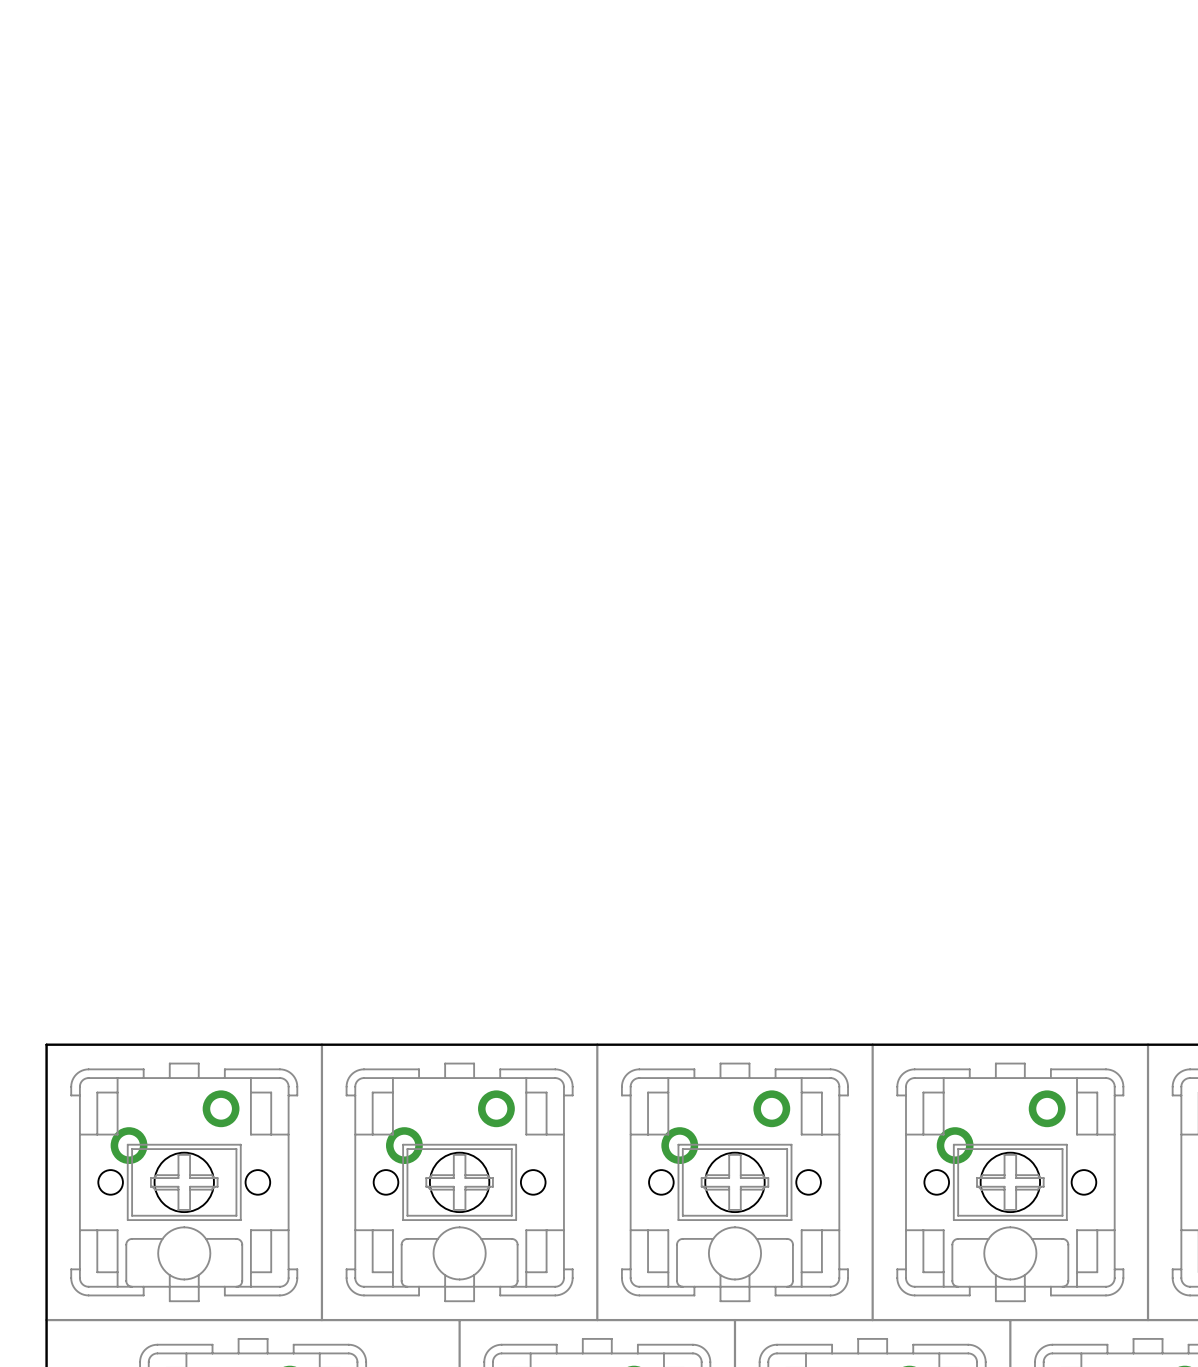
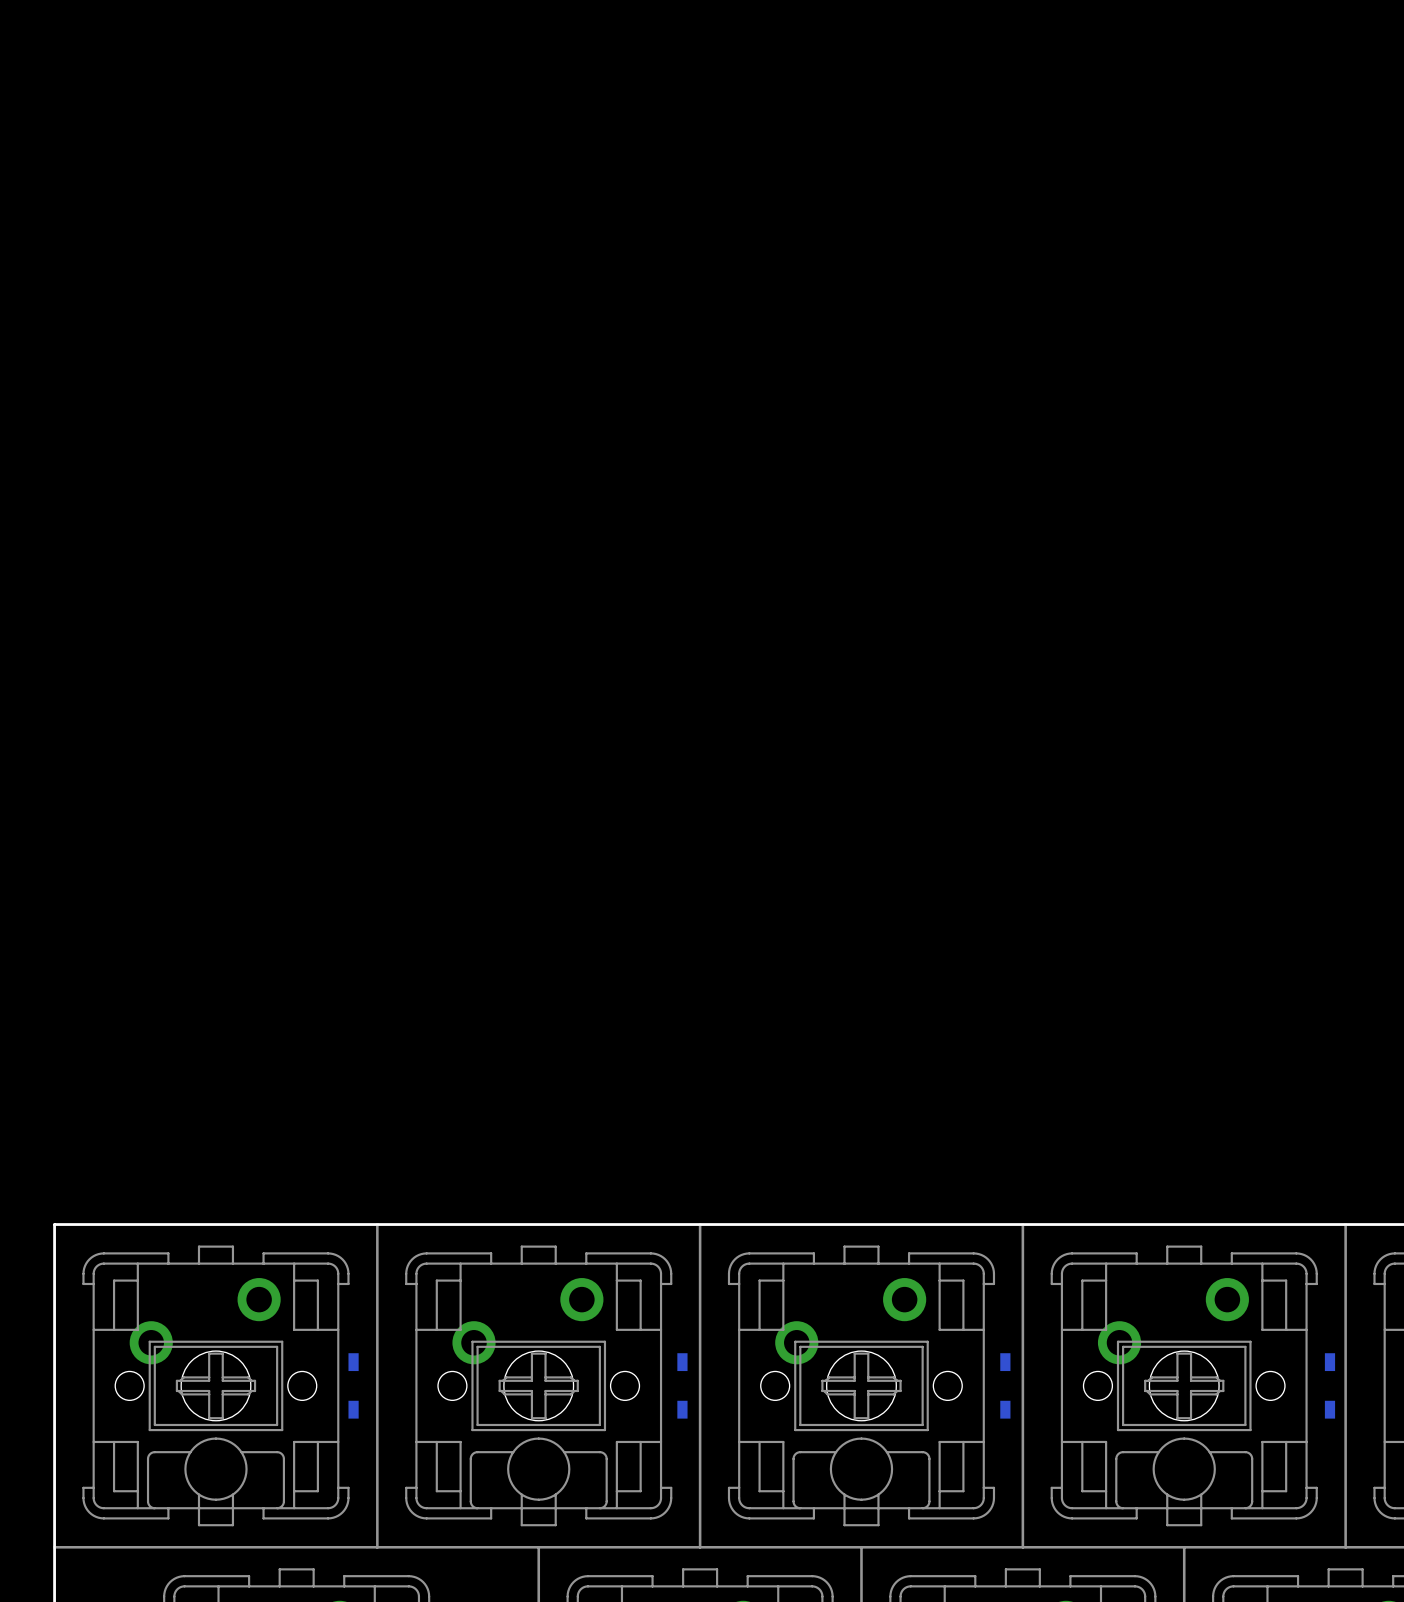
part: none -> (353, 1385)
part: none -> (682, 1385)
part: none -> (1005, 1385)
part: none -> (1329, 1385)

